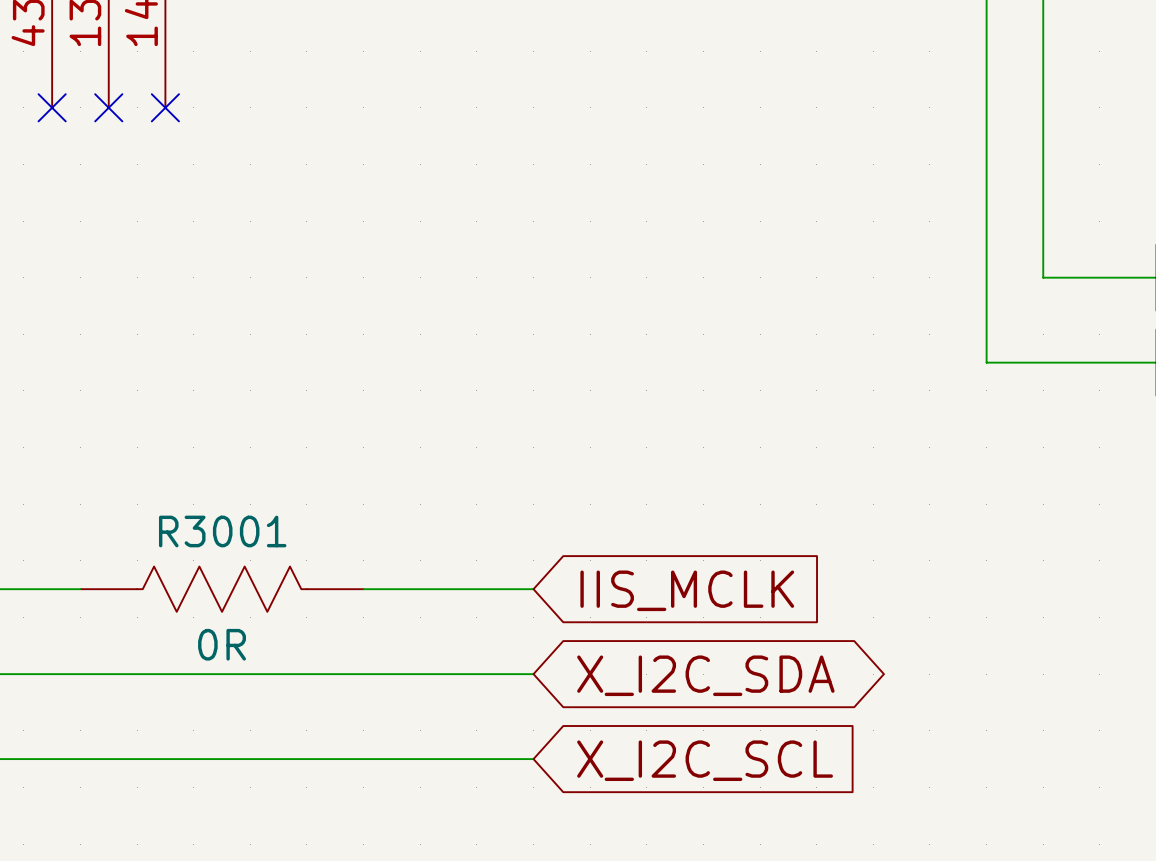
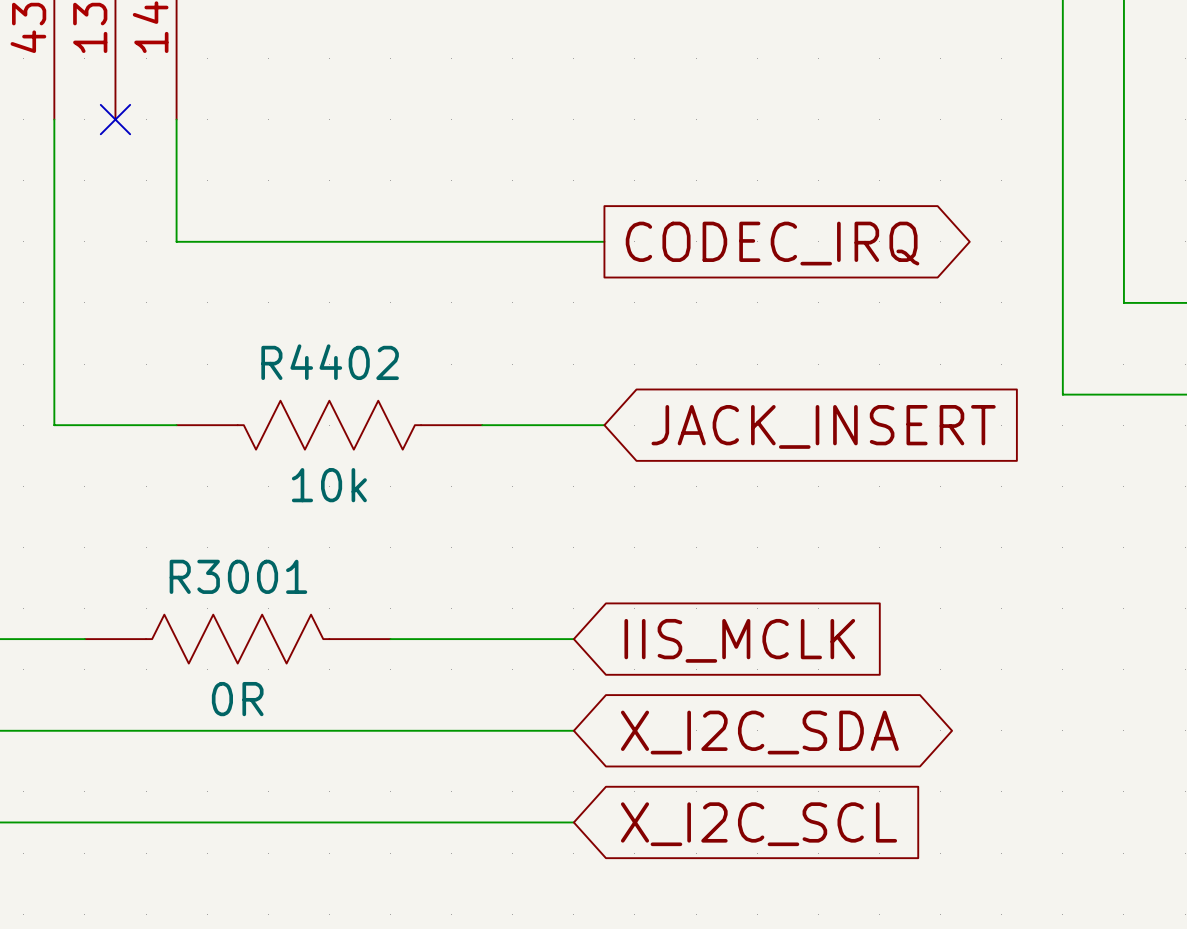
wire: none -> (54, 119) (54, 425) (176, 425)
no-connect mark: (52, 107) -> none
wire: none -> (176, 119) (176, 241) (604, 241)
no-connect mark: (165, 107) -> none
global label: none -> CODEC_IRQ (772, 243)
R4402: none -> 10k (329, 425)
wire: none -> (482, 425) (604, 425)
global label: none -> JACK_INSERT (823, 426)

